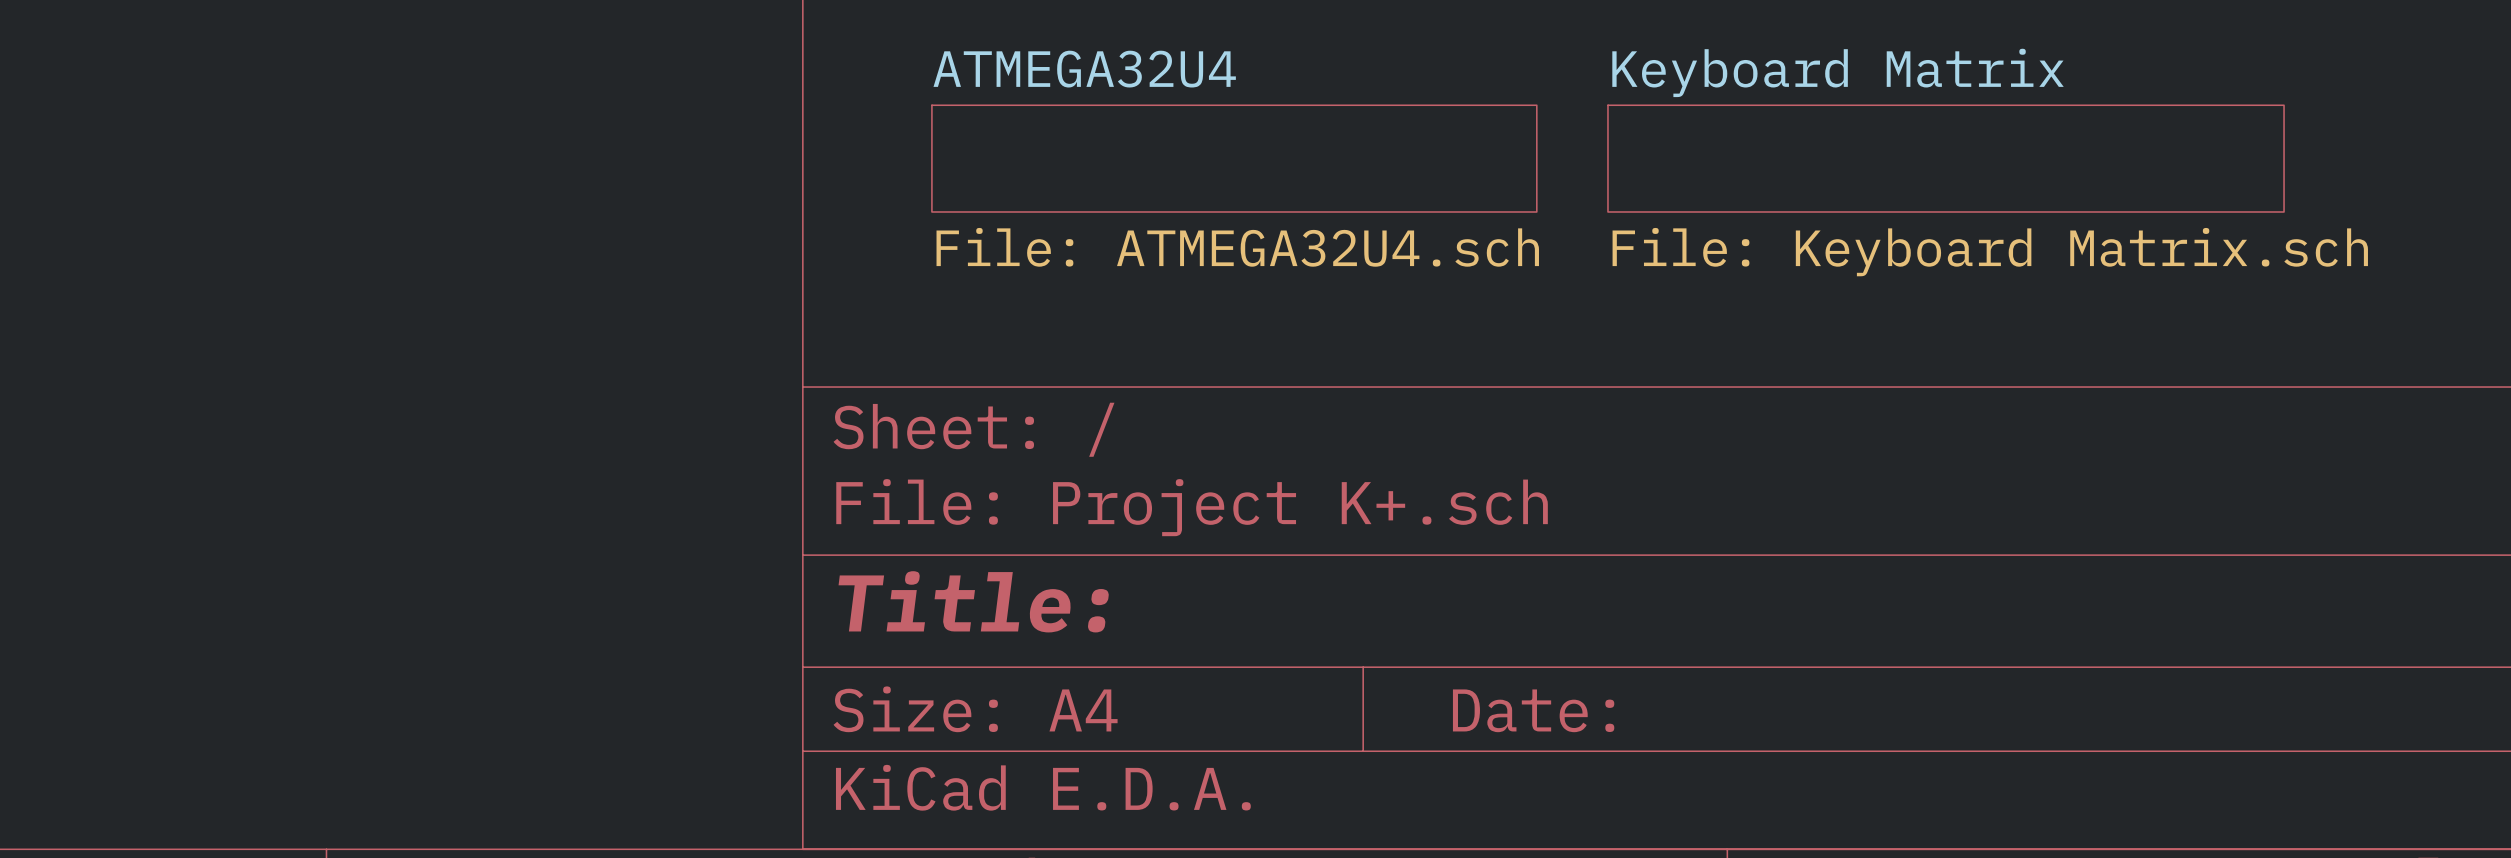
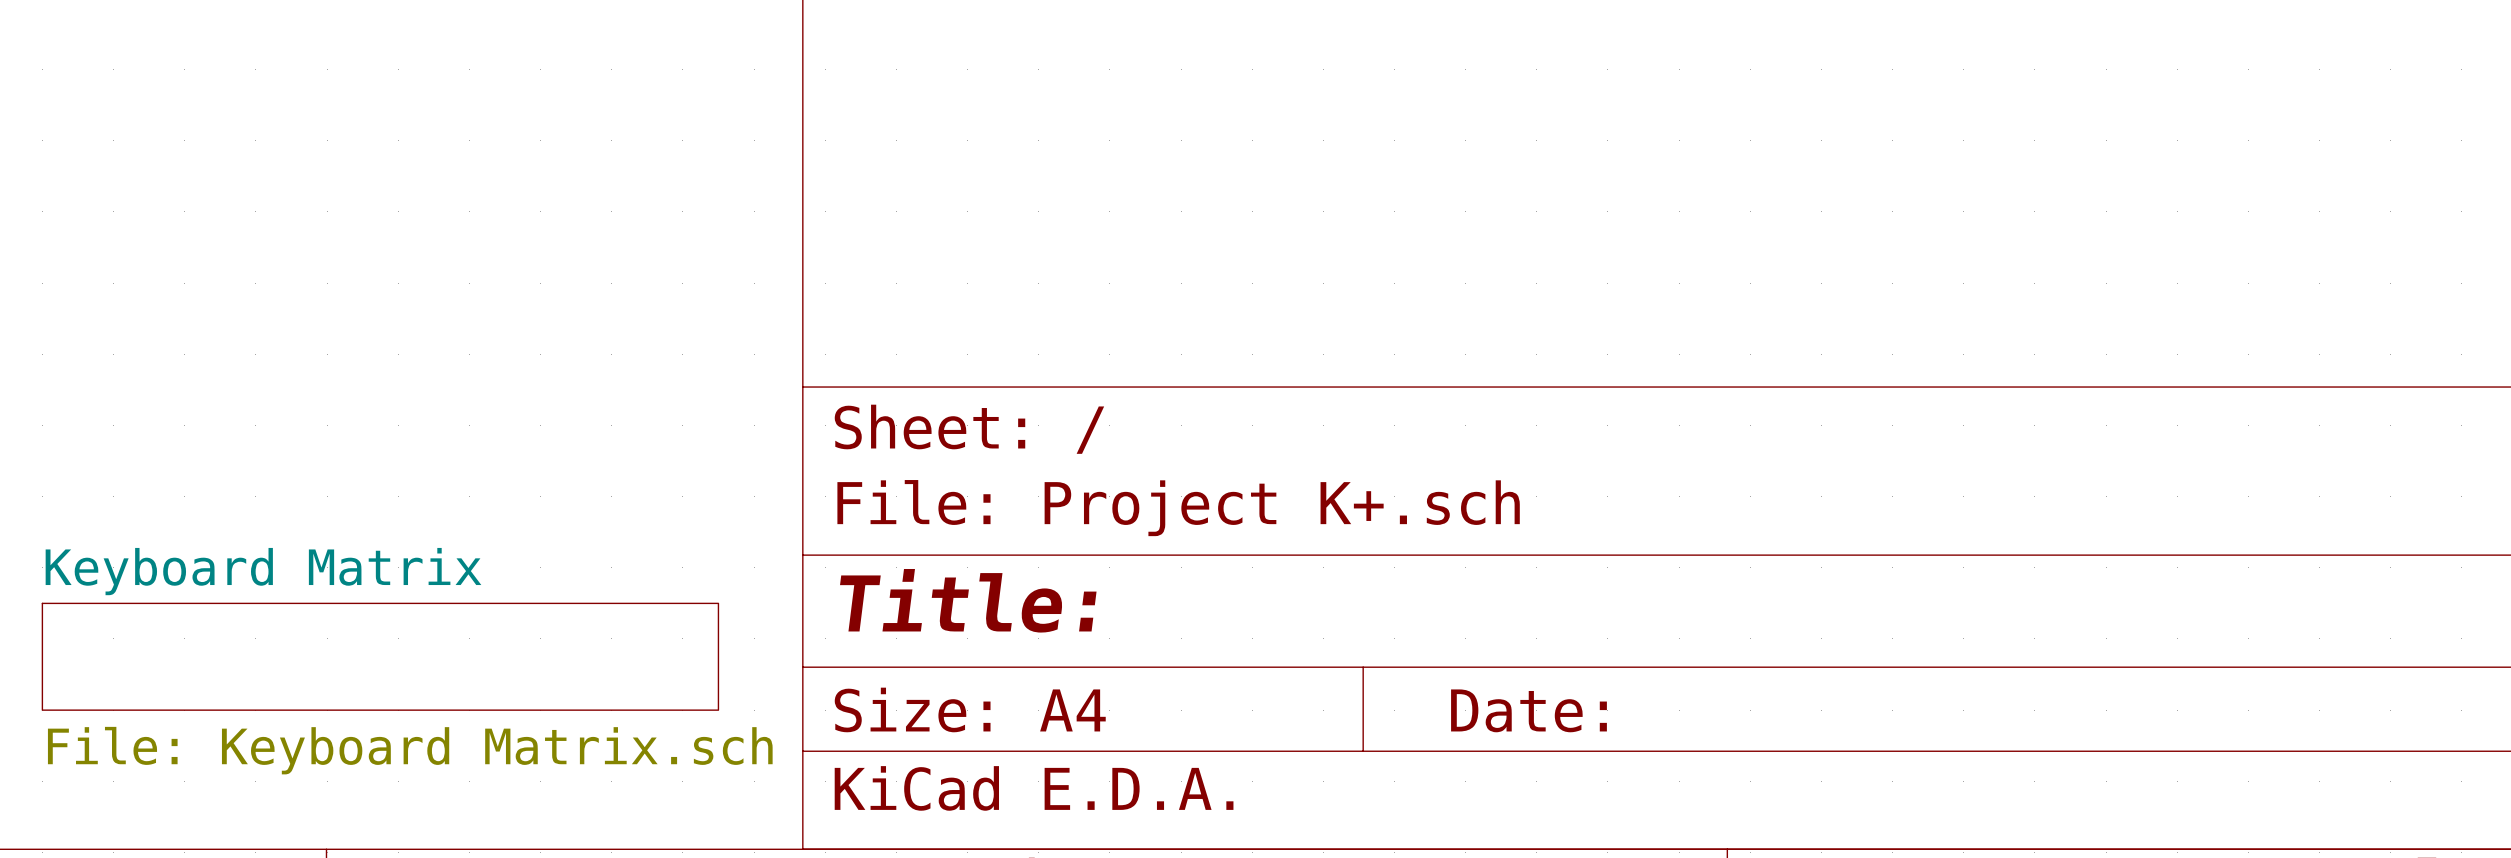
sheet ATMEGA32U4: File: ATMEGA32U4.sch (1234, 158) -> none
sheet Keyboard Matrix: File: Keyboard Matrix.sch (1946, 158) -> none
sheet Keyboard Matrix: none -> File: Keyboard Matrix.sch (380, 656)

